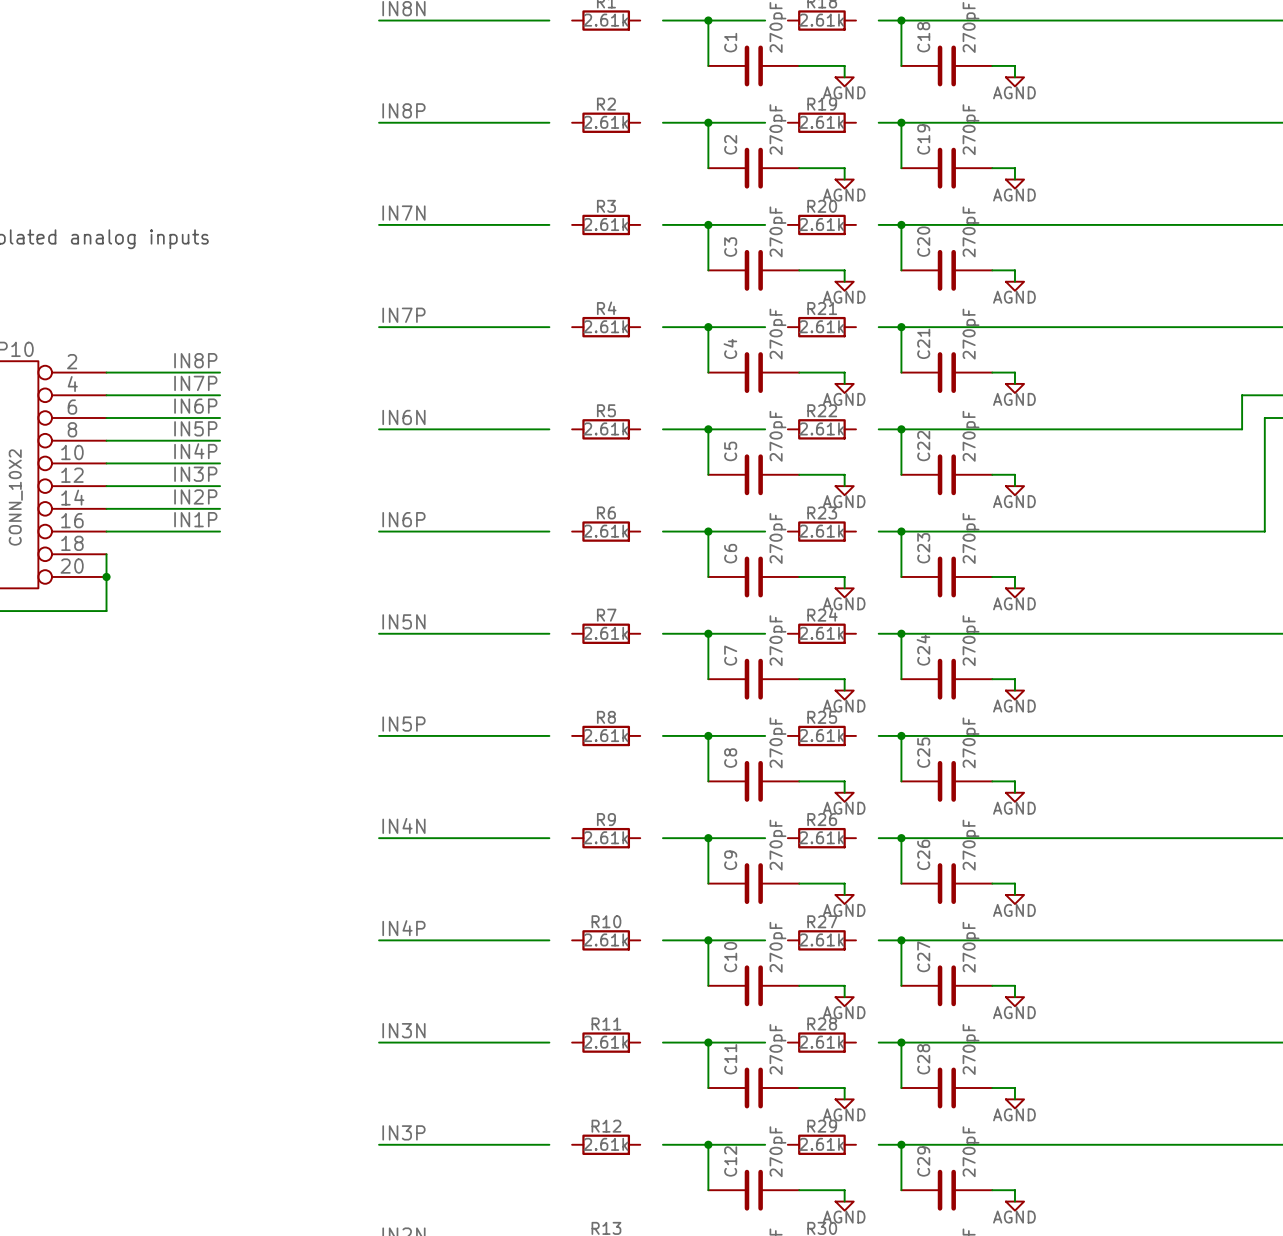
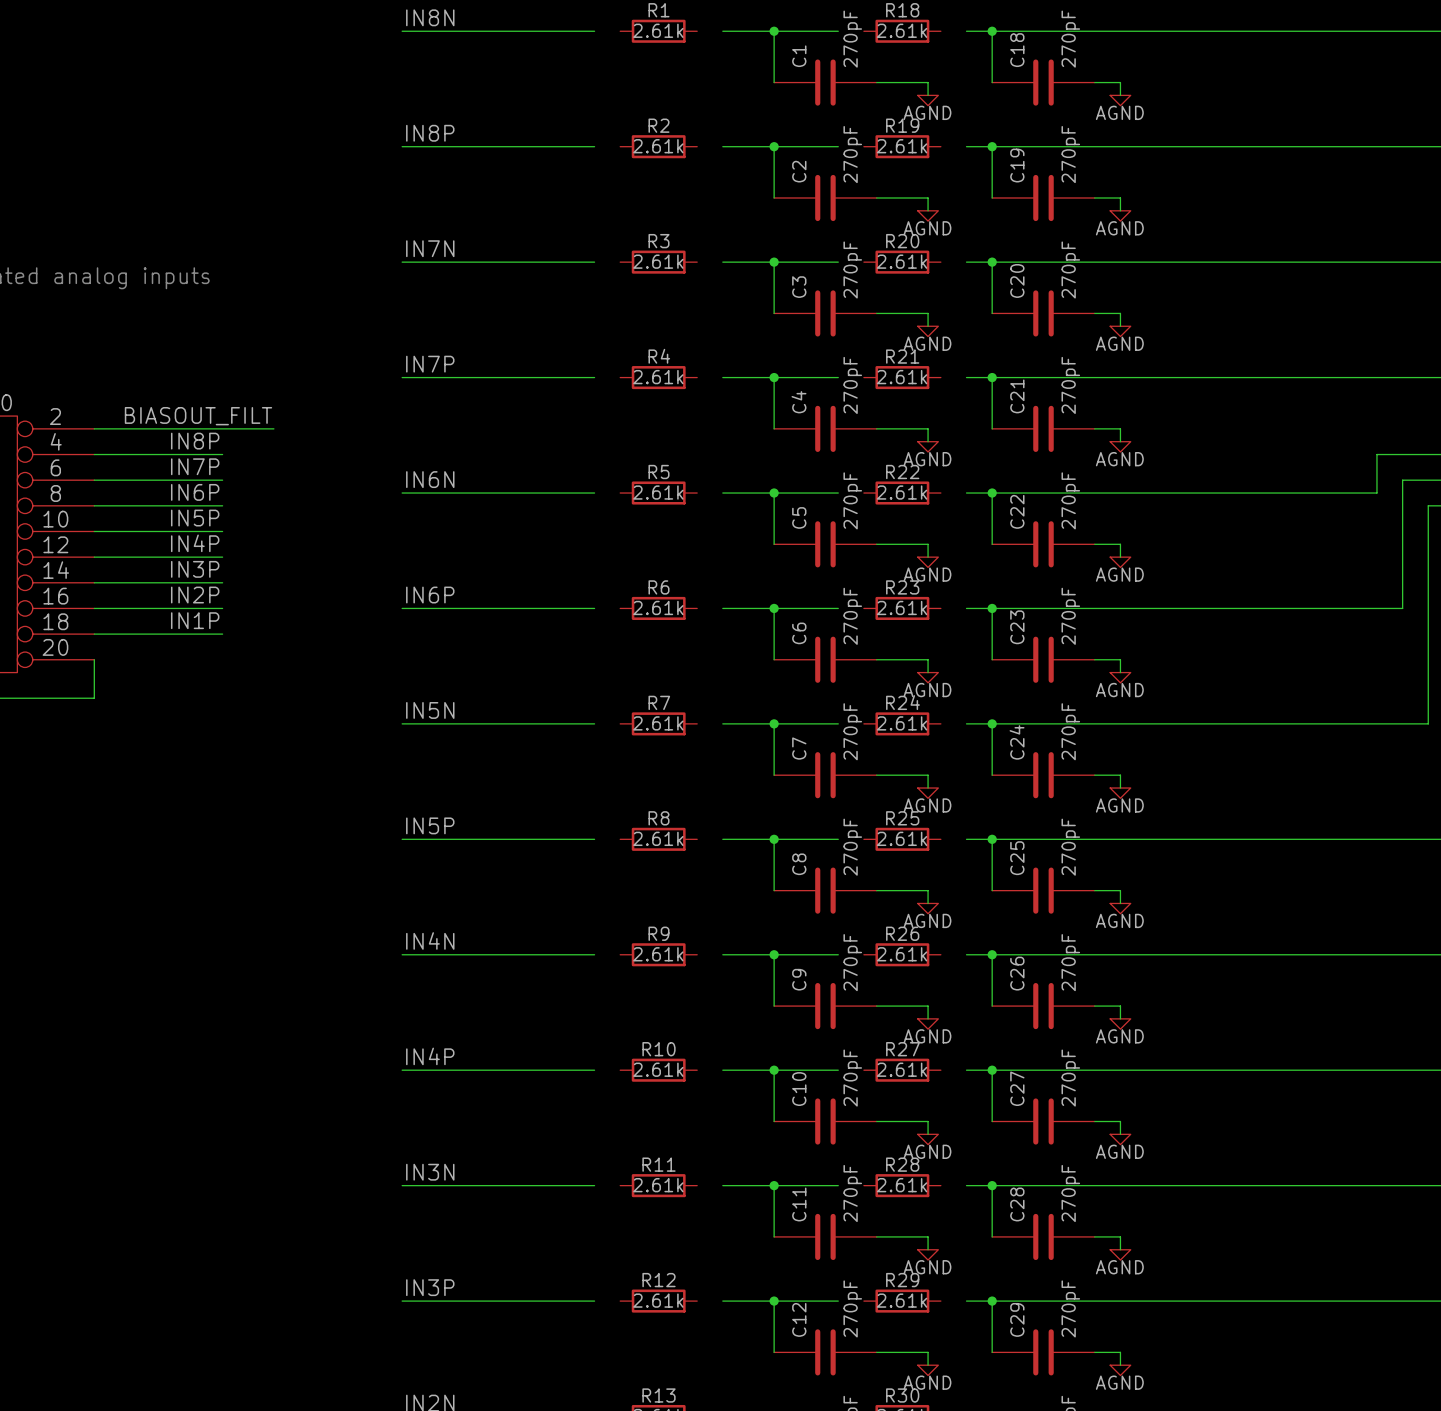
label: IN8P (195, 360) -> none
label: none -> BIASOUT_FILT (198, 416)
wire: none -> (222, 428) (273, 428)
label: IN7P (195, 383) -> IN8P (195, 441)
label: IN6P (195, 406) -> IN7P (195, 466)
label: IN5P (195, 428) -> IN6P (195, 492)
label: IN4P (195, 451) -> IN5P (195, 518)
label: IN3P (195, 474) -> IN4P (195, 543)
label: IN2P (195, 496) -> IN3P (195, 569)
label: IN1P (195, 519) -> IN2P (195, 595)
label: none -> IN1P (195, 620)
wire: (106, 554) (106, 576) -> (94, 634) (222, 634)
junction: (106, 576) -> none

